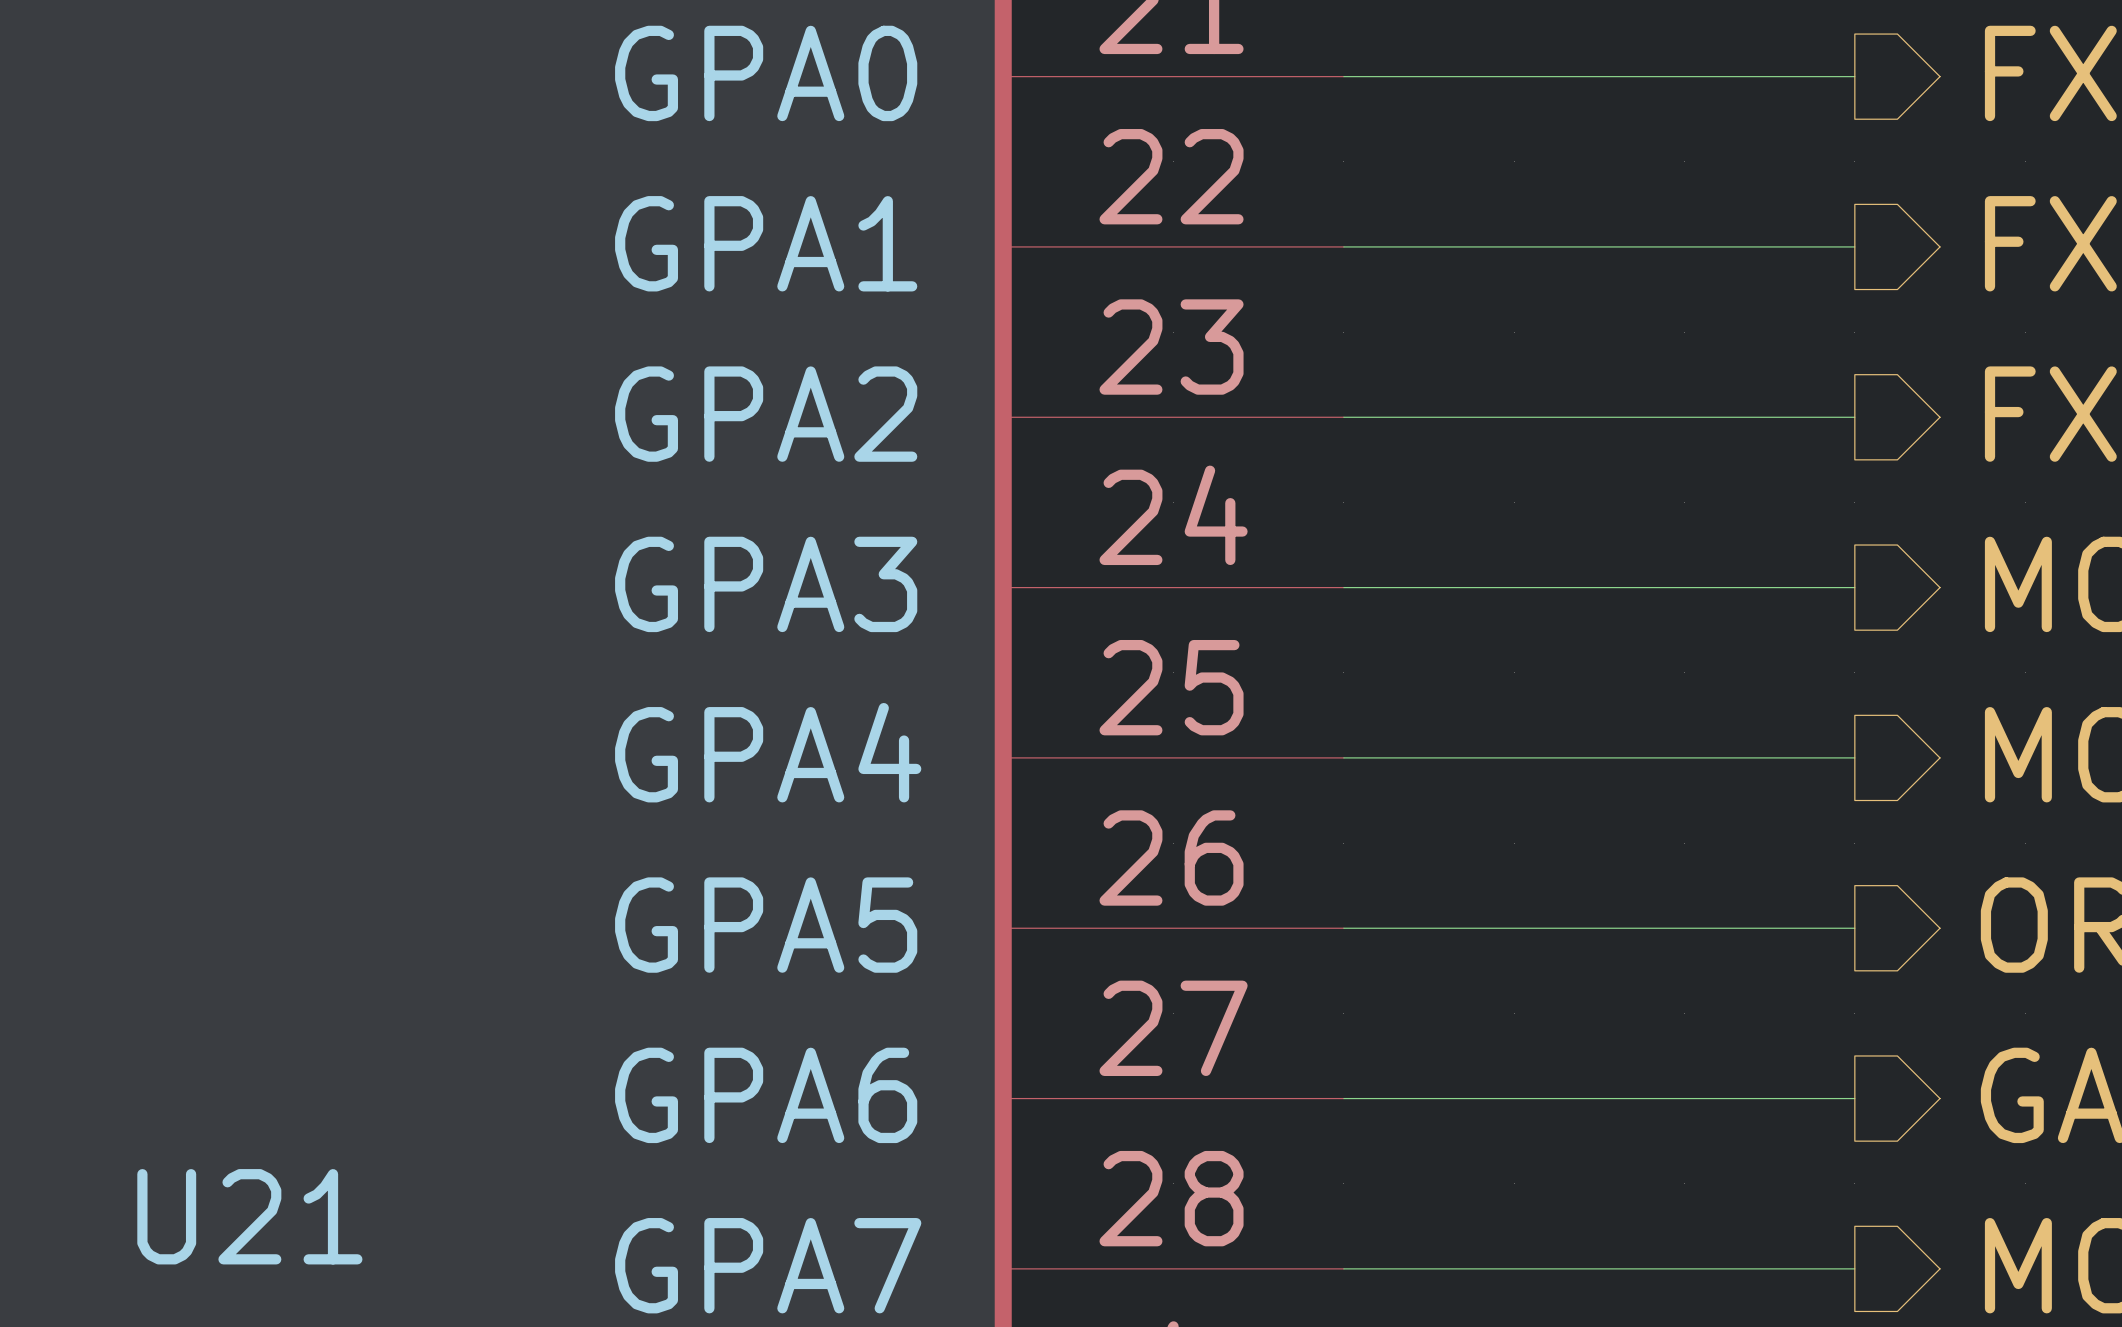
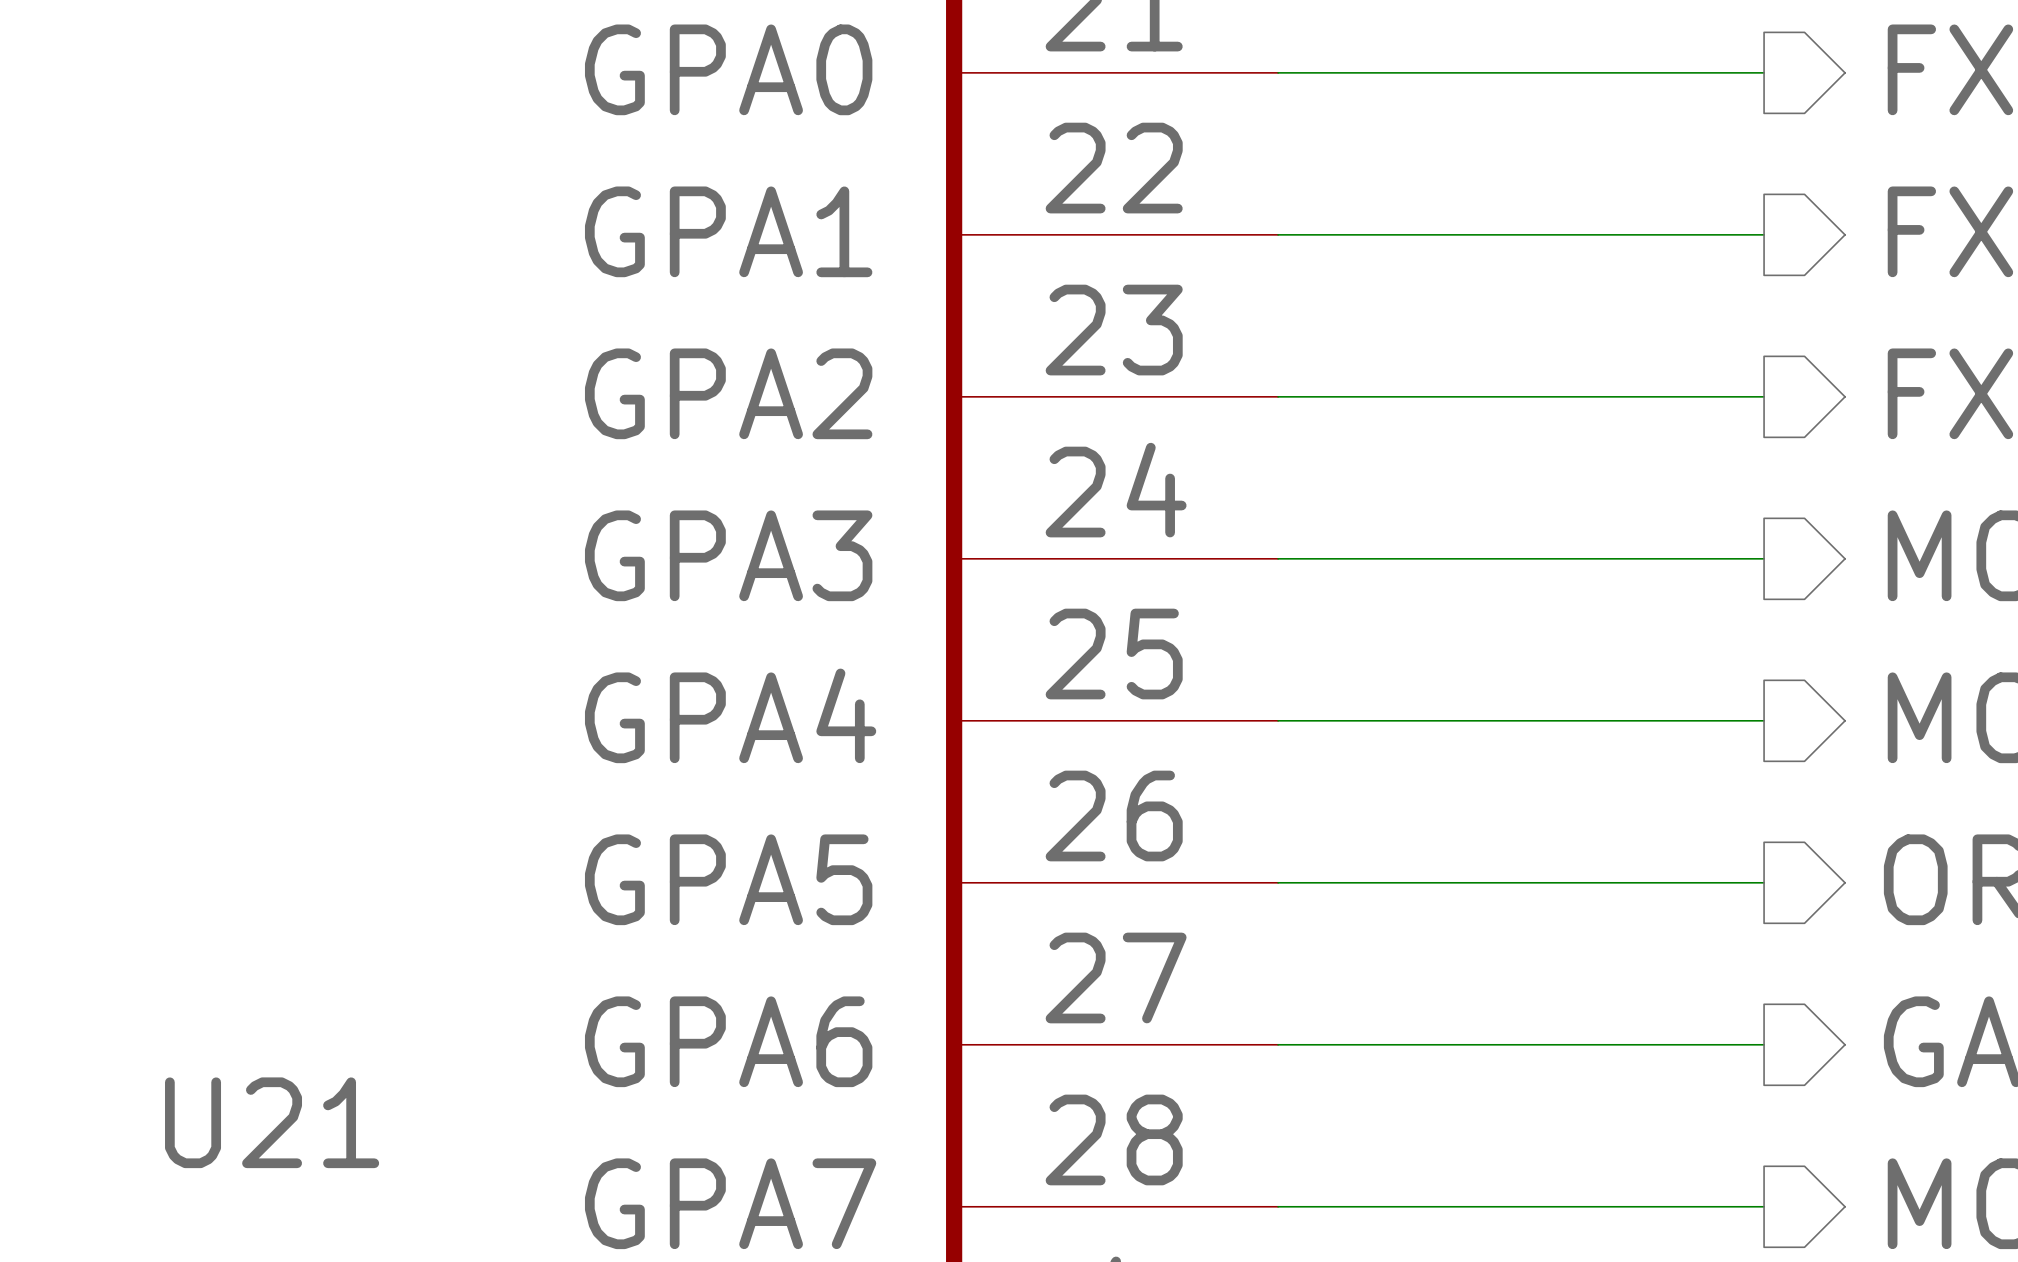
U21 name position: U21 (249, 1216) -> U21 (272, 1122)

